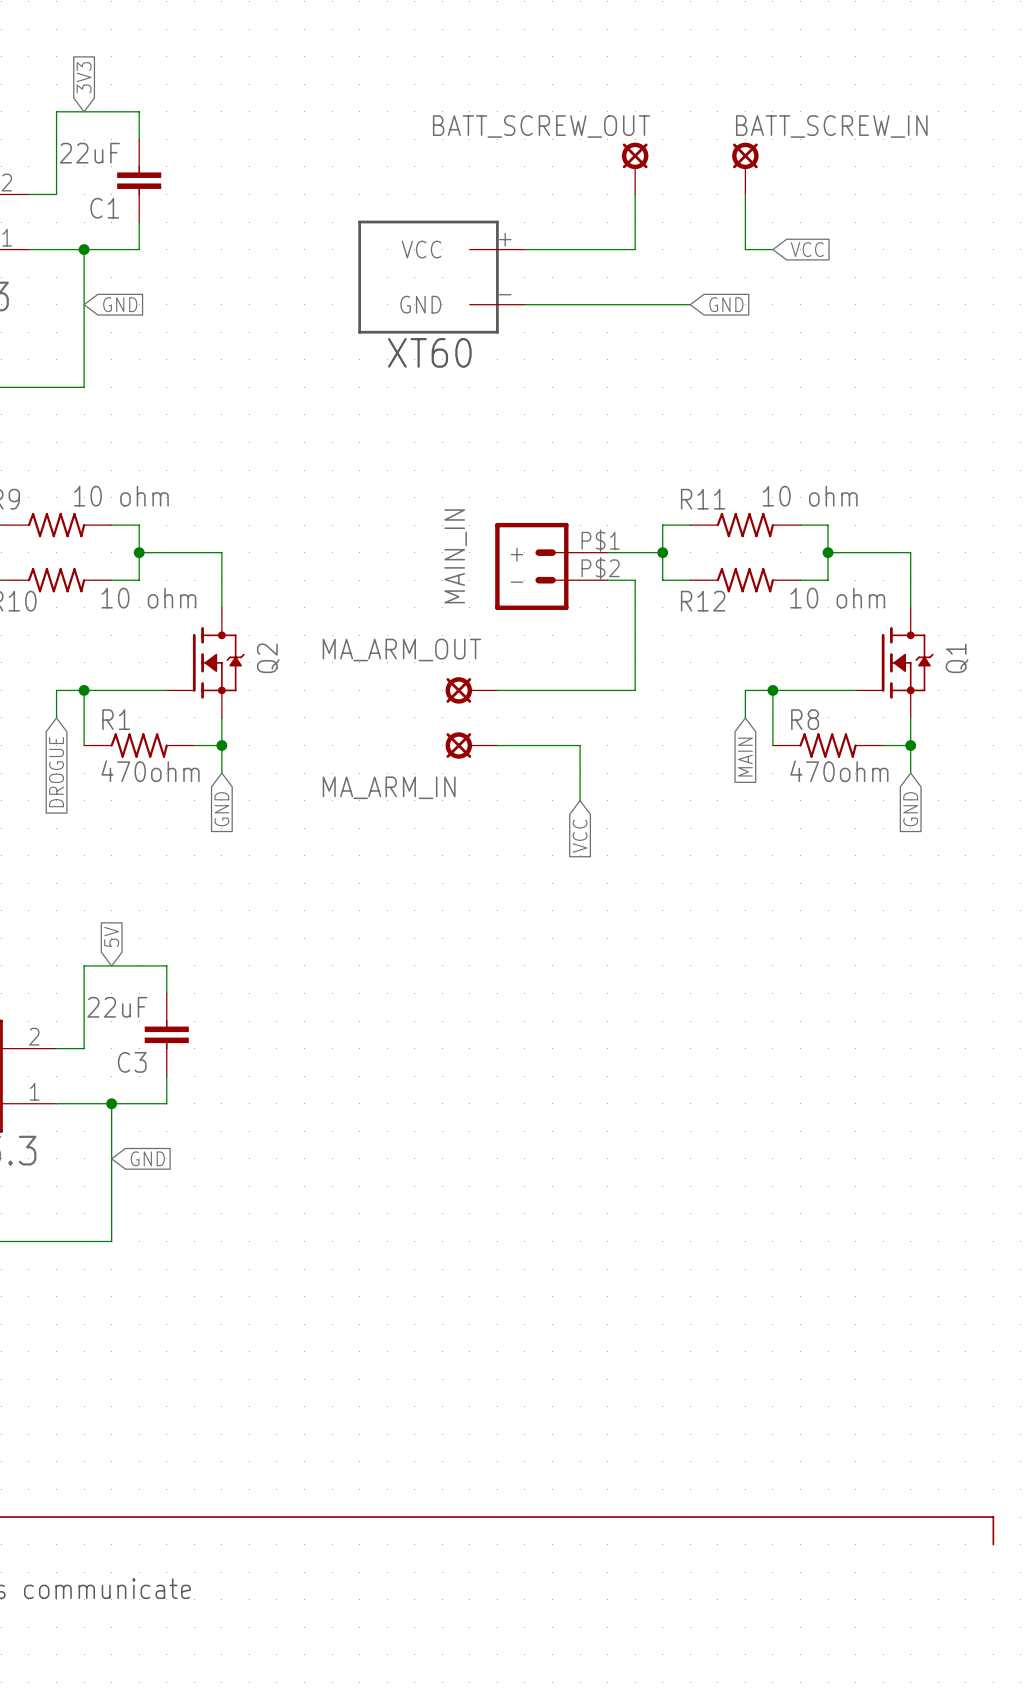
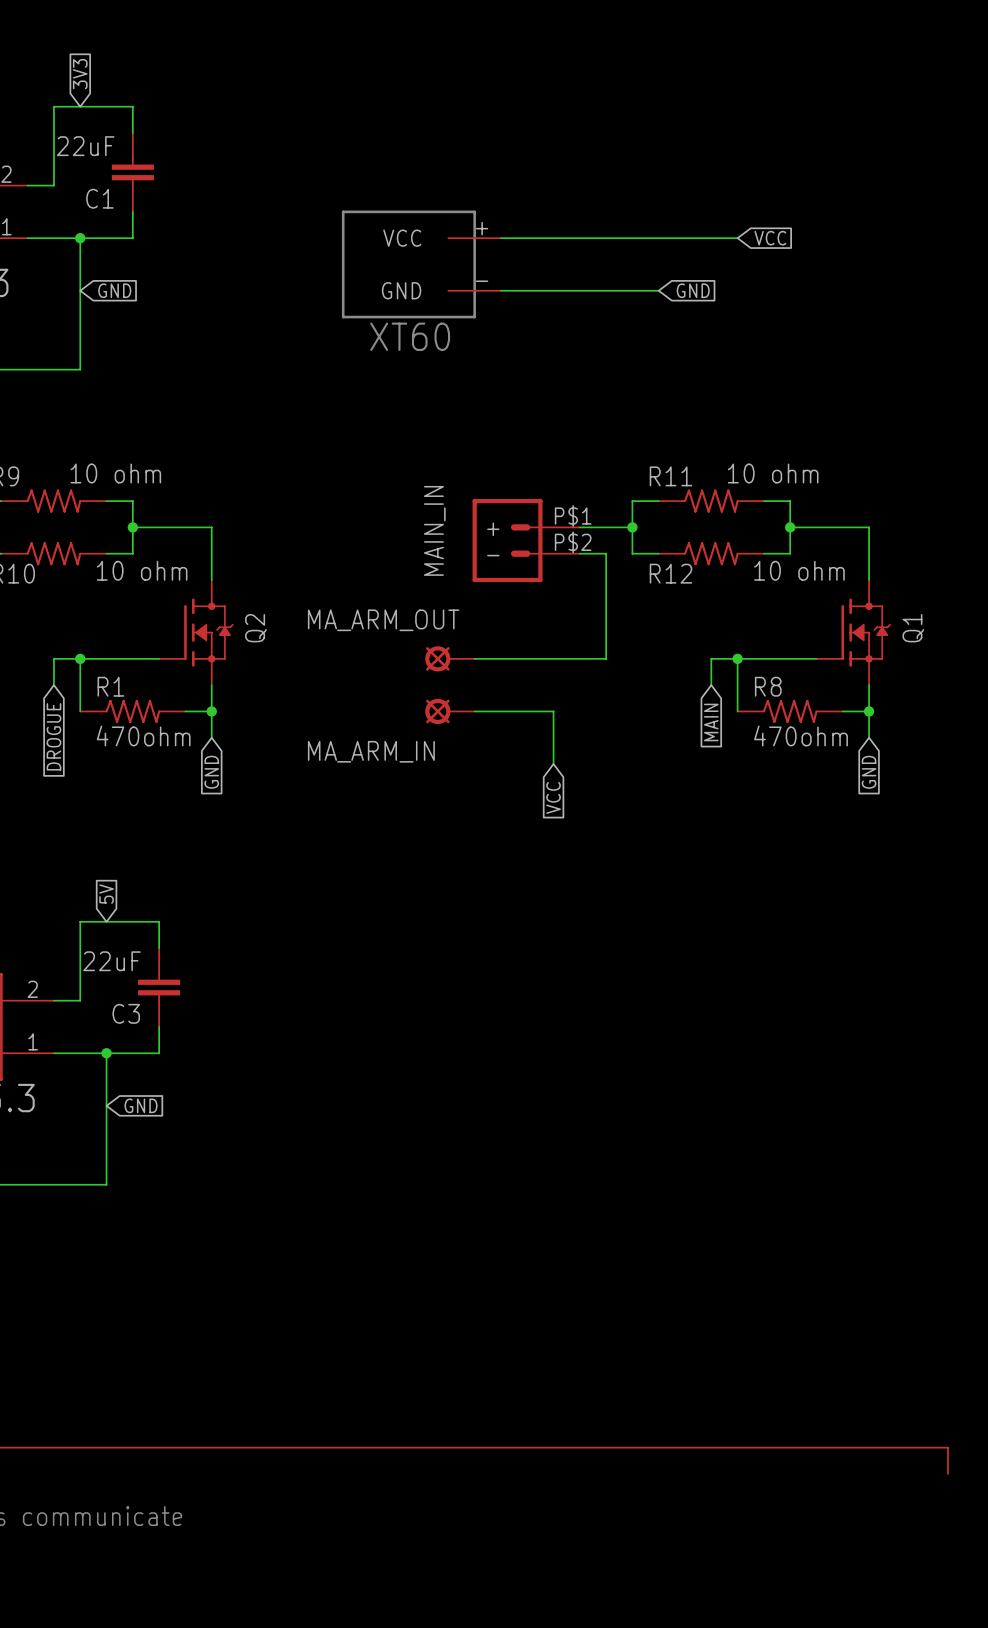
BATT_SCREW_OUT: (635, 168) -> none
BATT_SCREW_IN: (745, 168) -> none
wire: (635, 194) (635, 249) -> (711, 238) (606, 238)
wire: (745, 194) (745, 249) -> none

